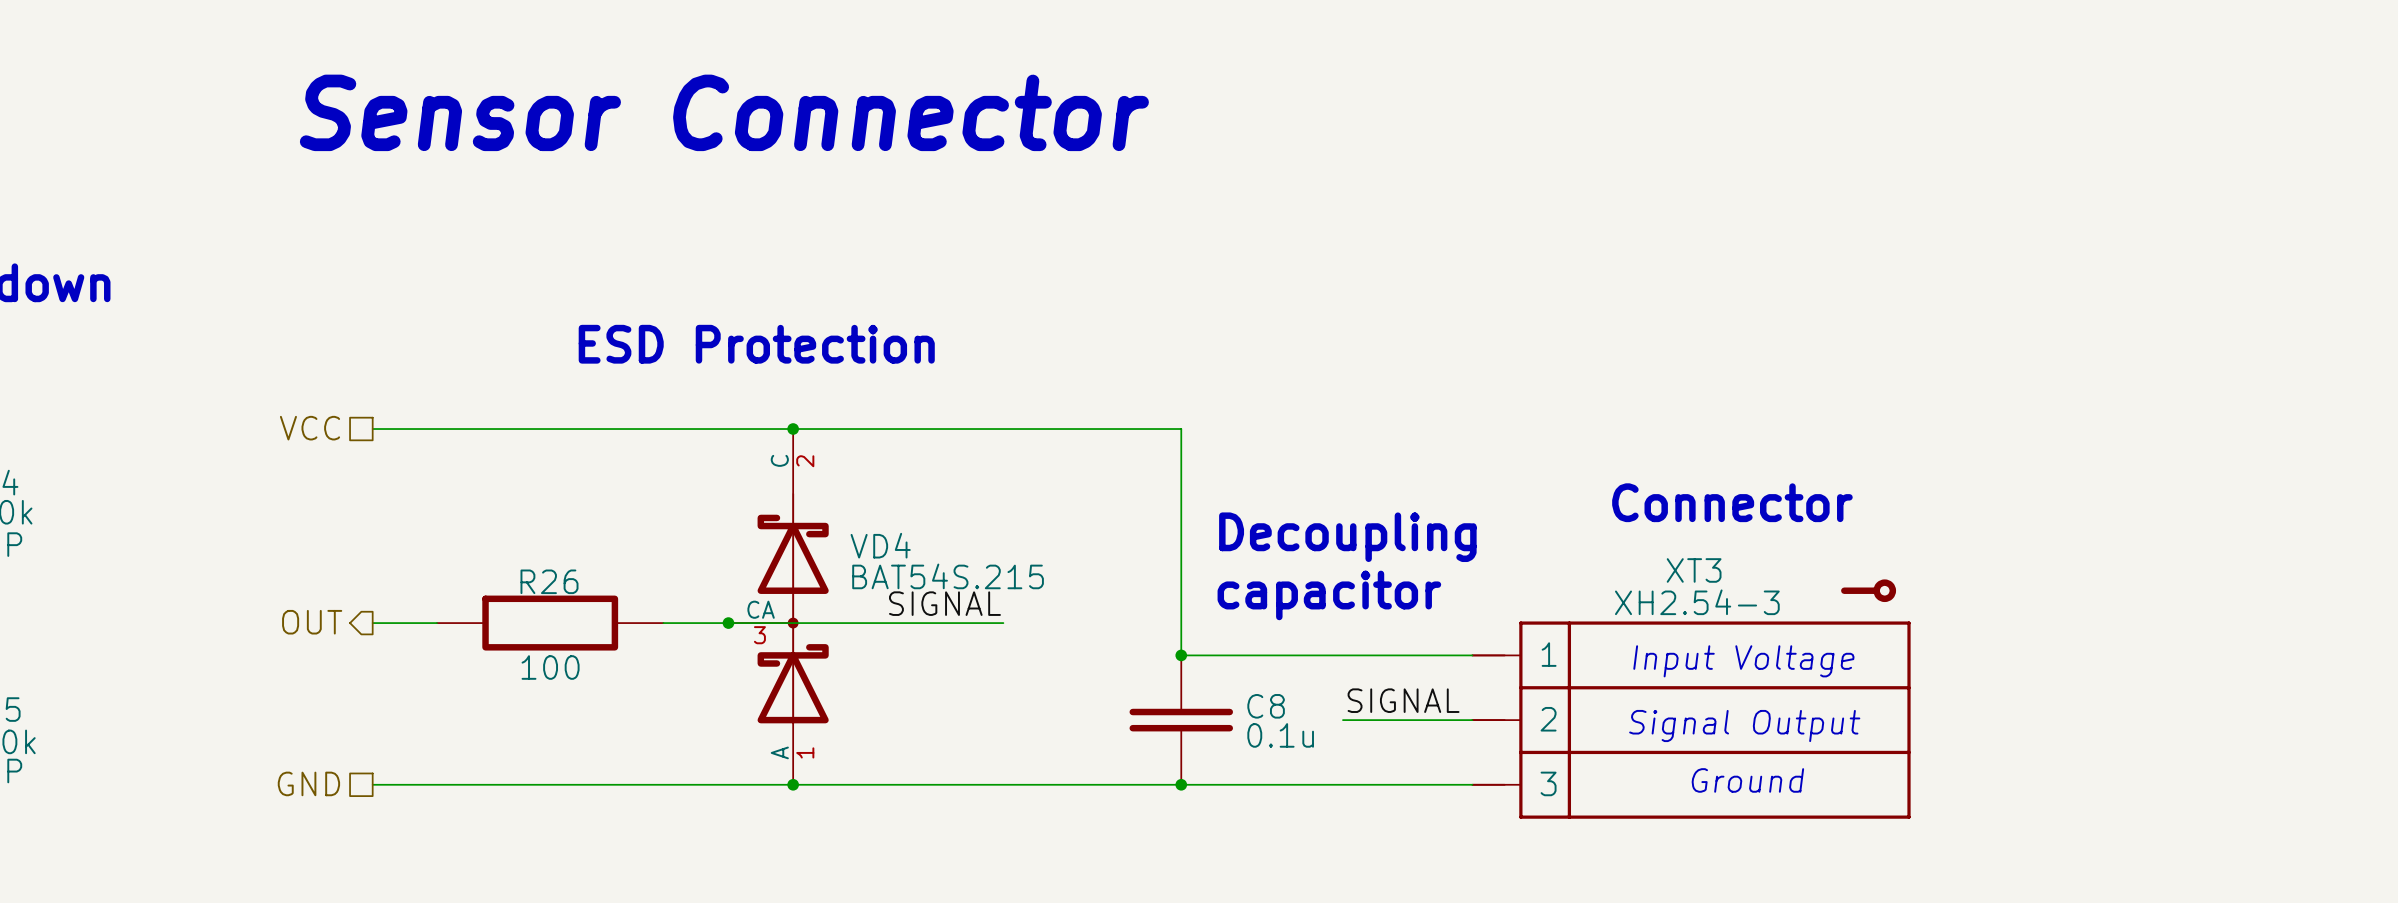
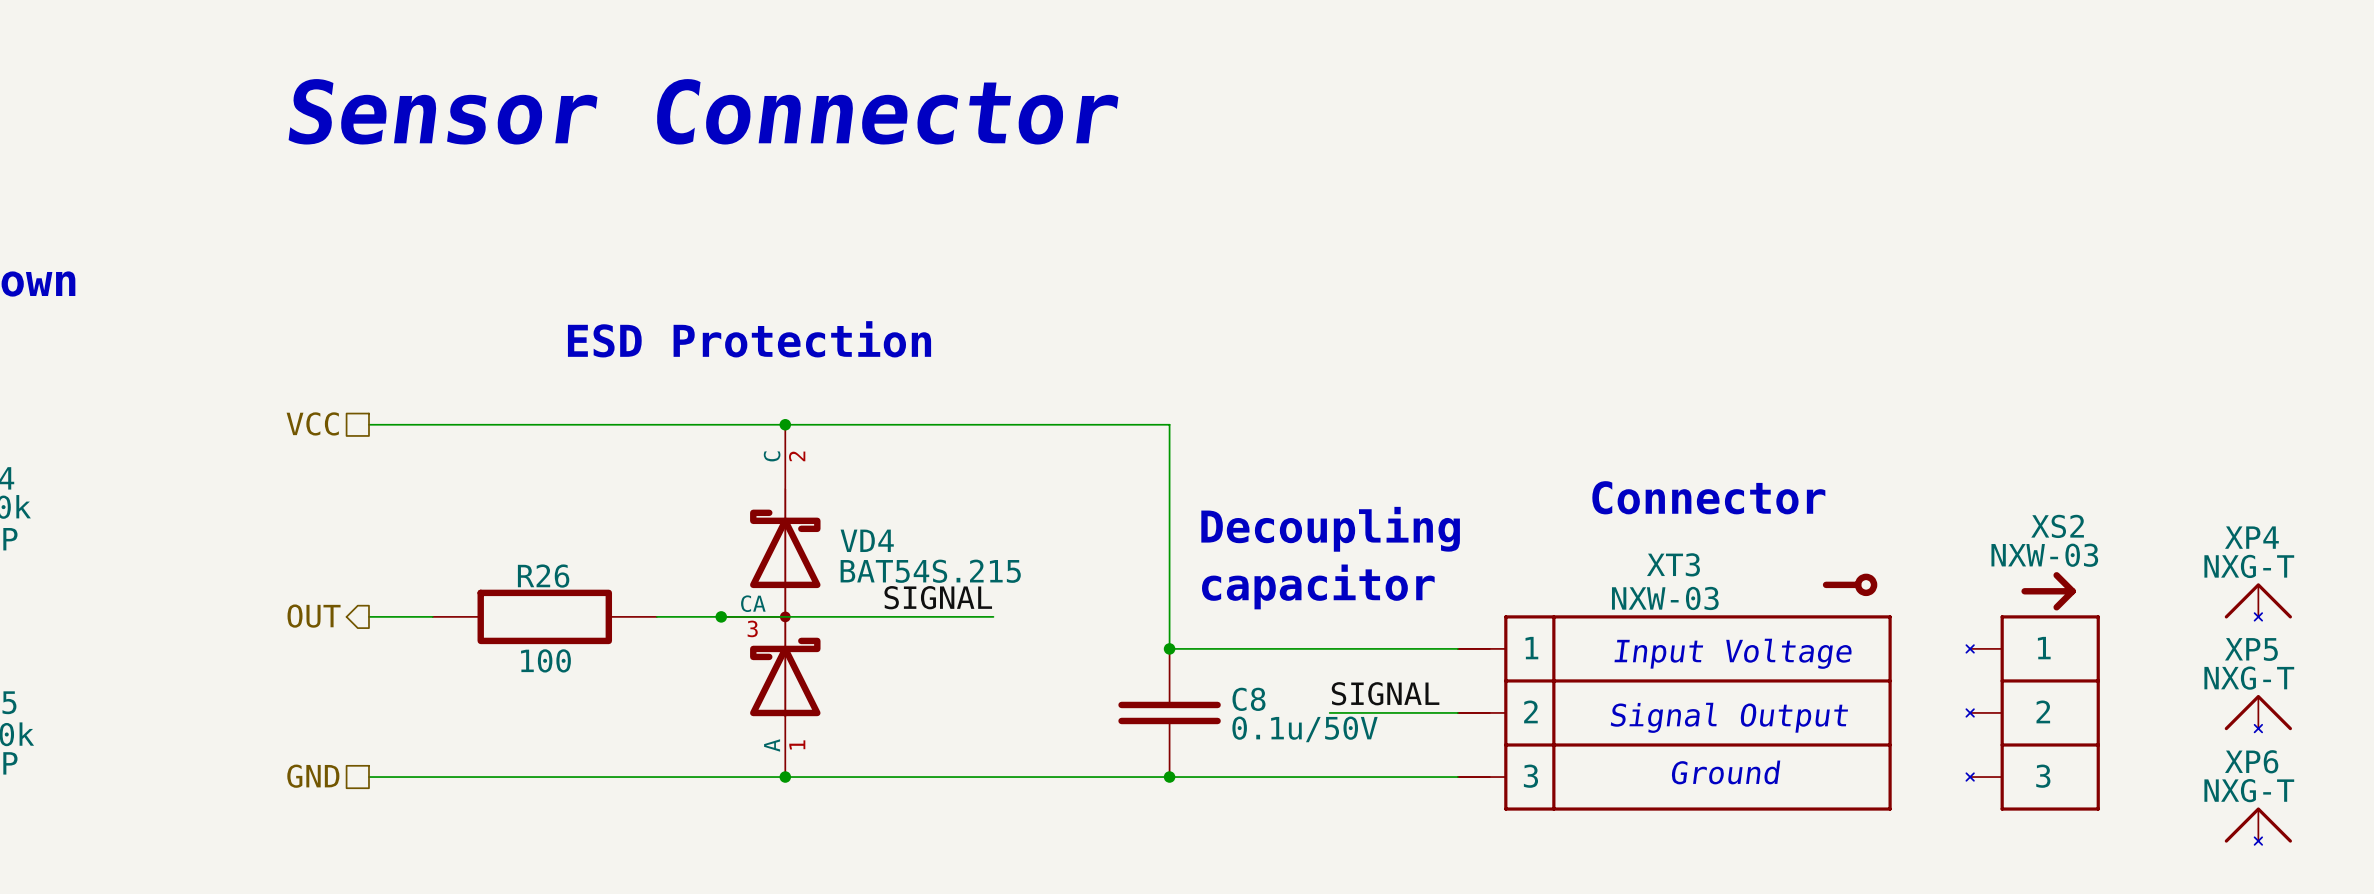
XT3 value: XH2.54-3 (1697, 602) -> NXW-03 (1665, 598)
XP4: none -> NXG-T (2258, 601)
XS2: none -> NXW-03 (2033, 691)
XP5: none -> NXG-T (2258, 713)
C8 value: 0.1u (1280, 735) -> 0.1u/50V (1305, 729)
XP6: none -> NXG-T (2258, 826)

